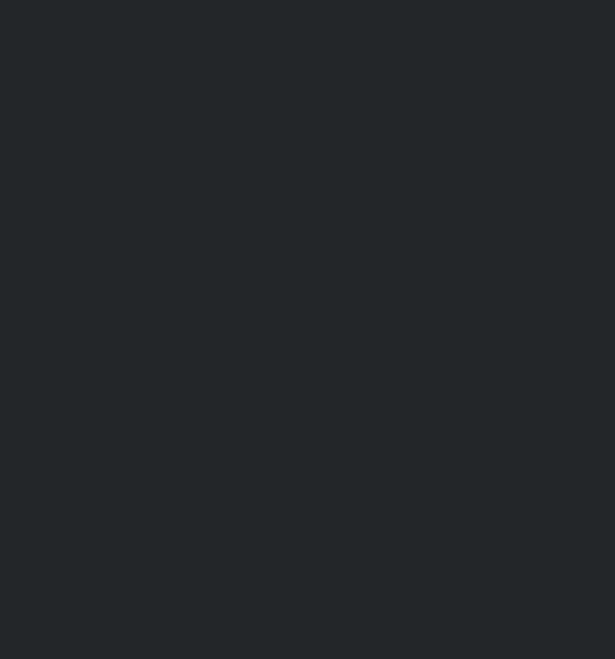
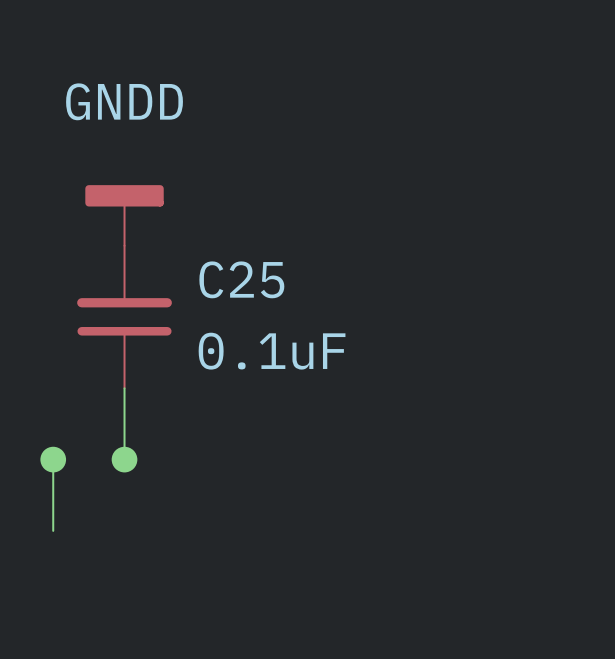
power symbol: none -> GNDD (124, 215)
C25: none -> 0.1uF (124, 317)
wire: none -> (124, 388) (124, 459)
wire: none -> (53, 459) (53, 530)
junction: none -> (53, 459)
junction: none -> (124, 459)

